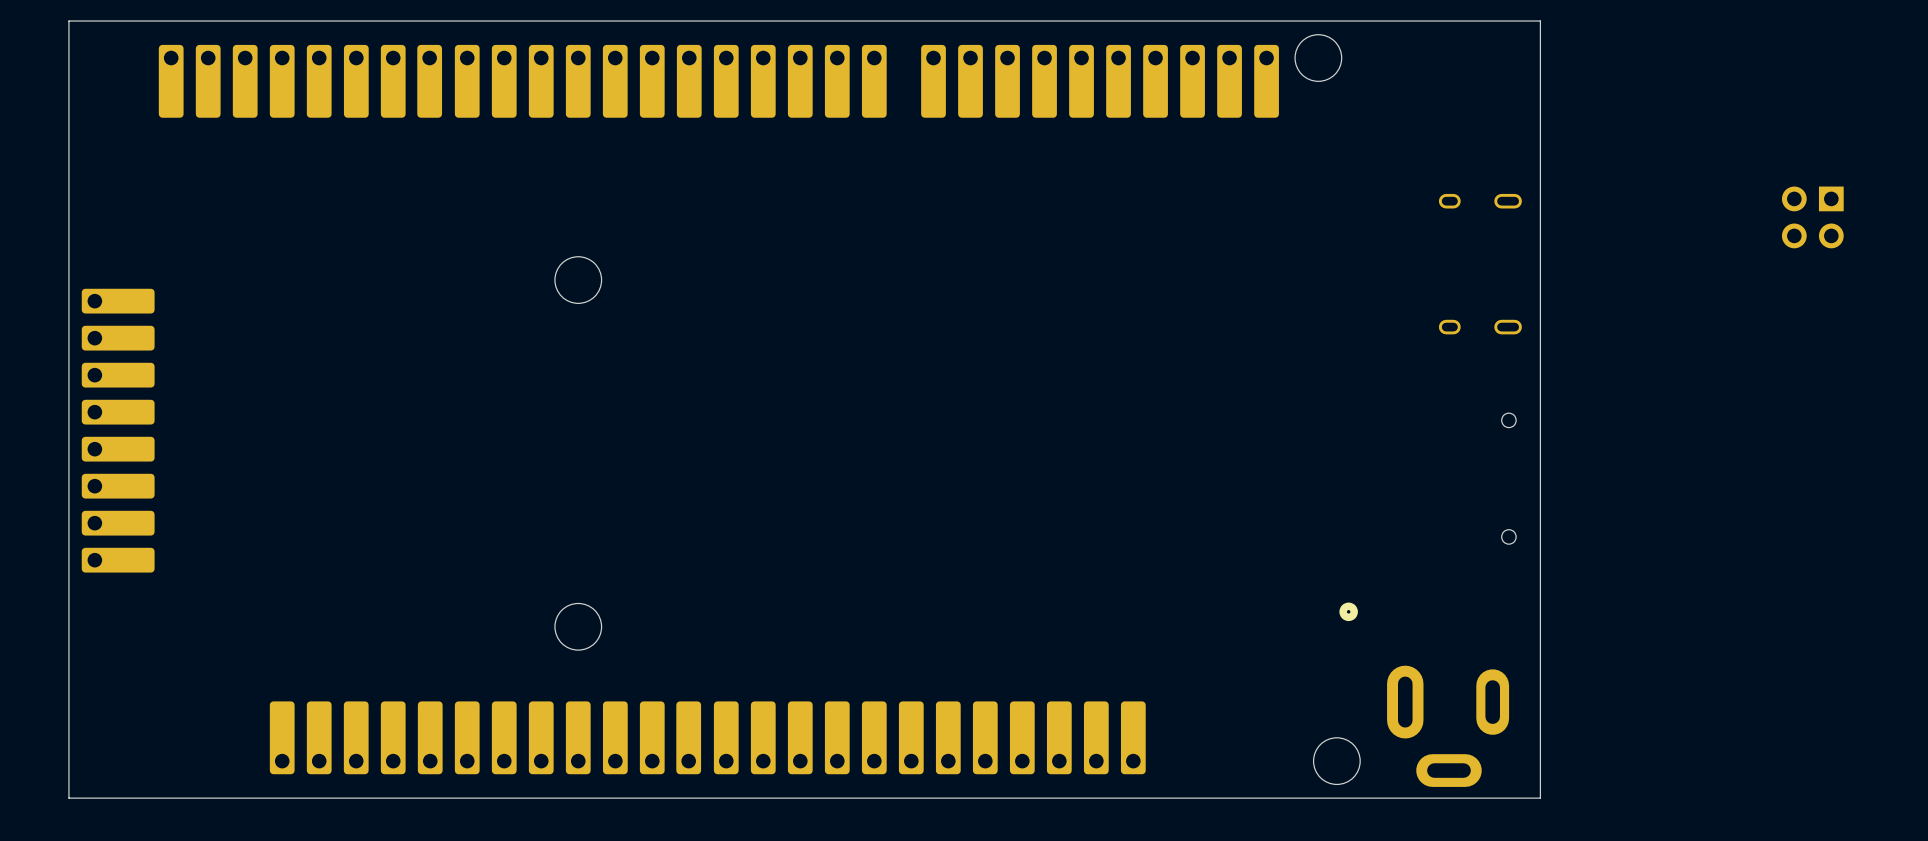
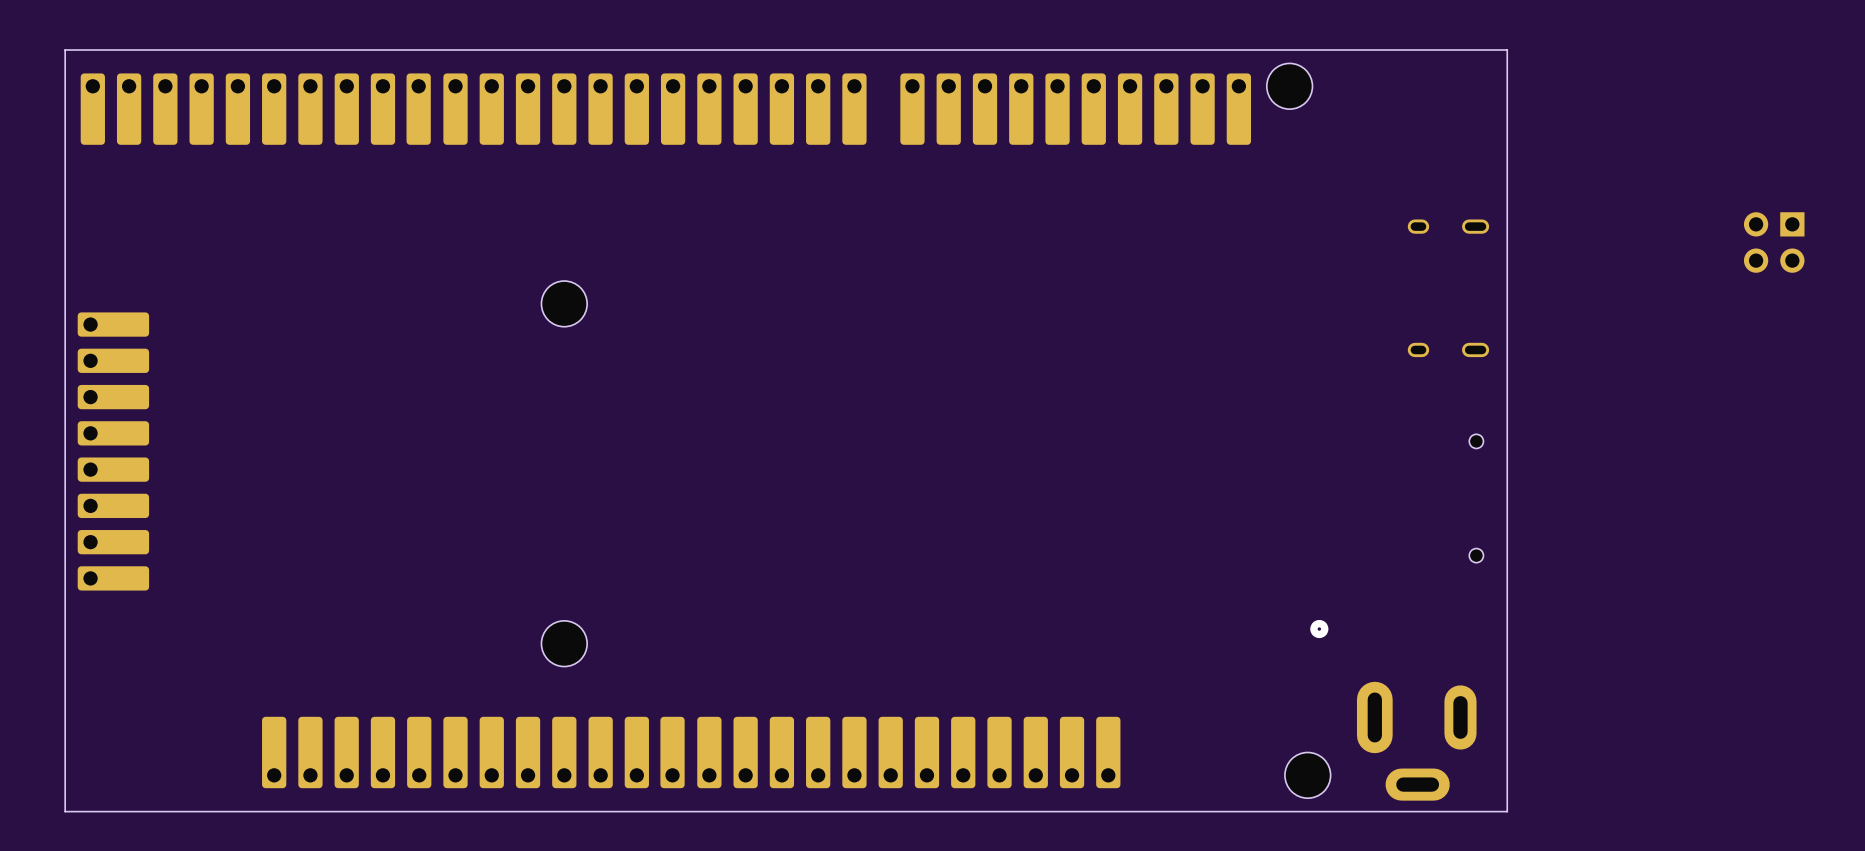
part: none -> (473, 109)

